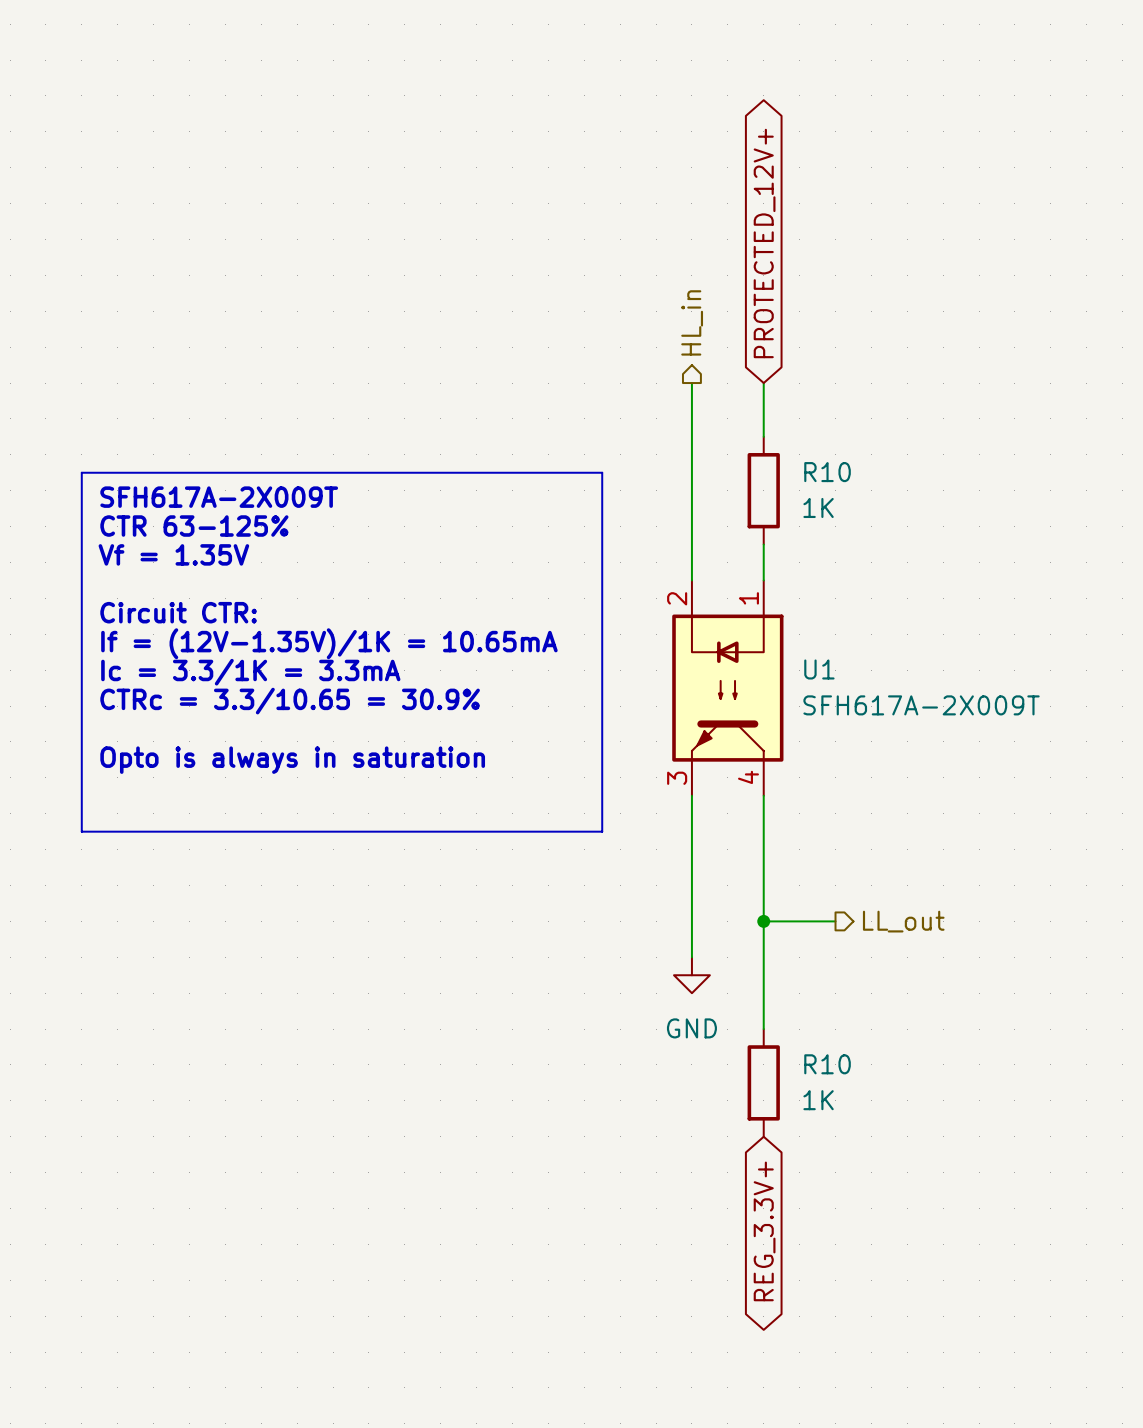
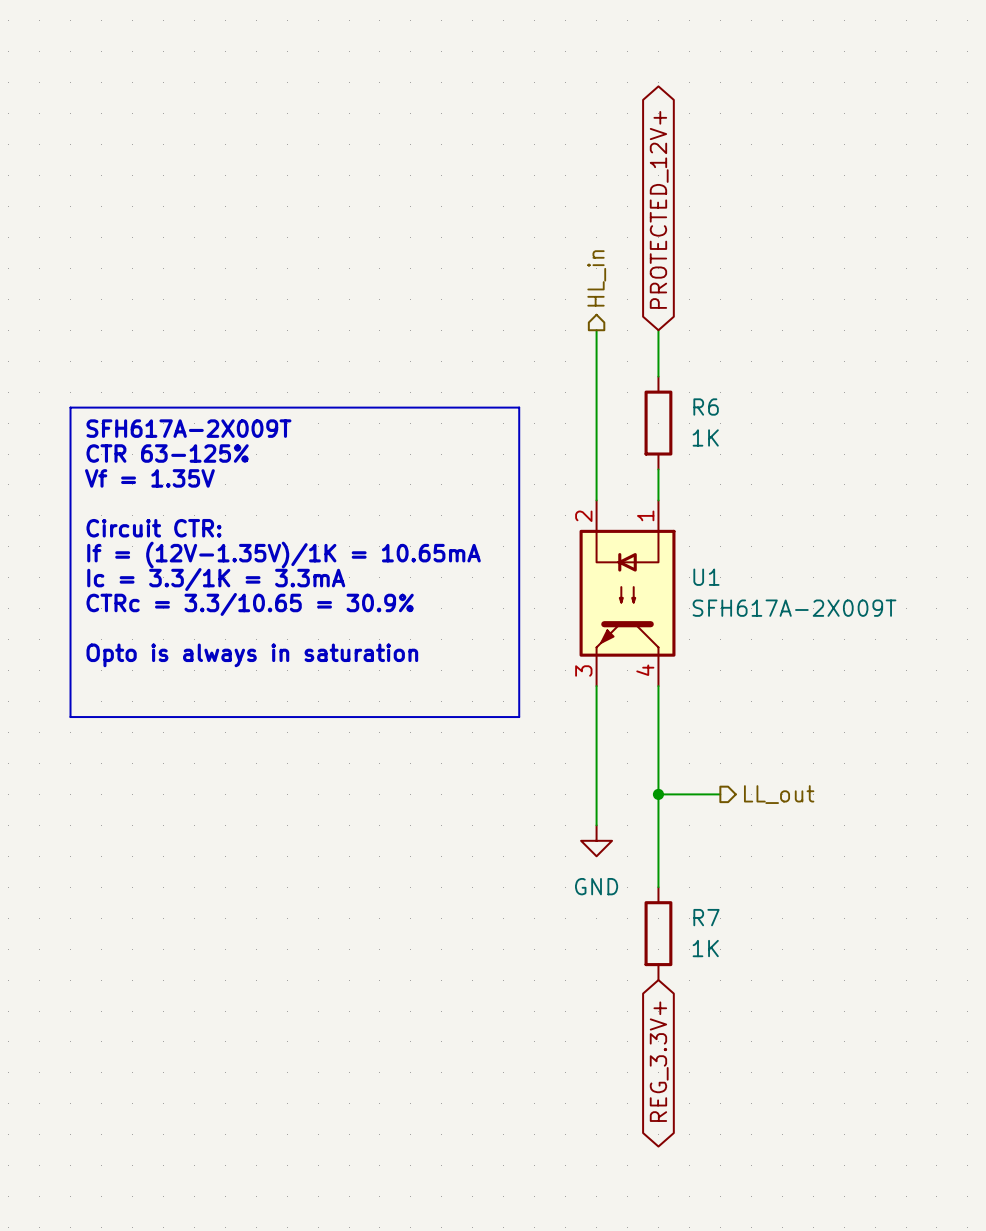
R10 name: R10 (827, 472) -> R6 (706, 407)
R10 name: R10 (827, 1064) -> R7 (706, 917)

